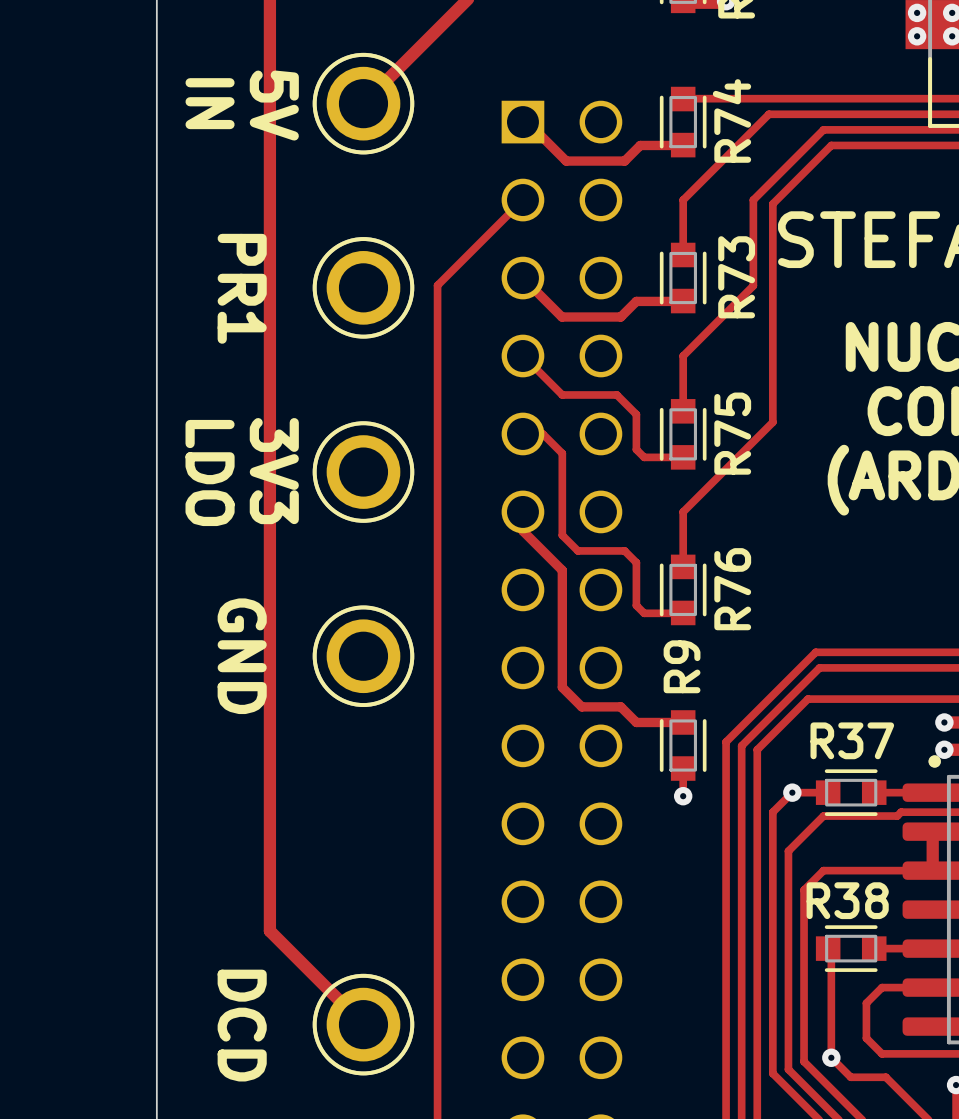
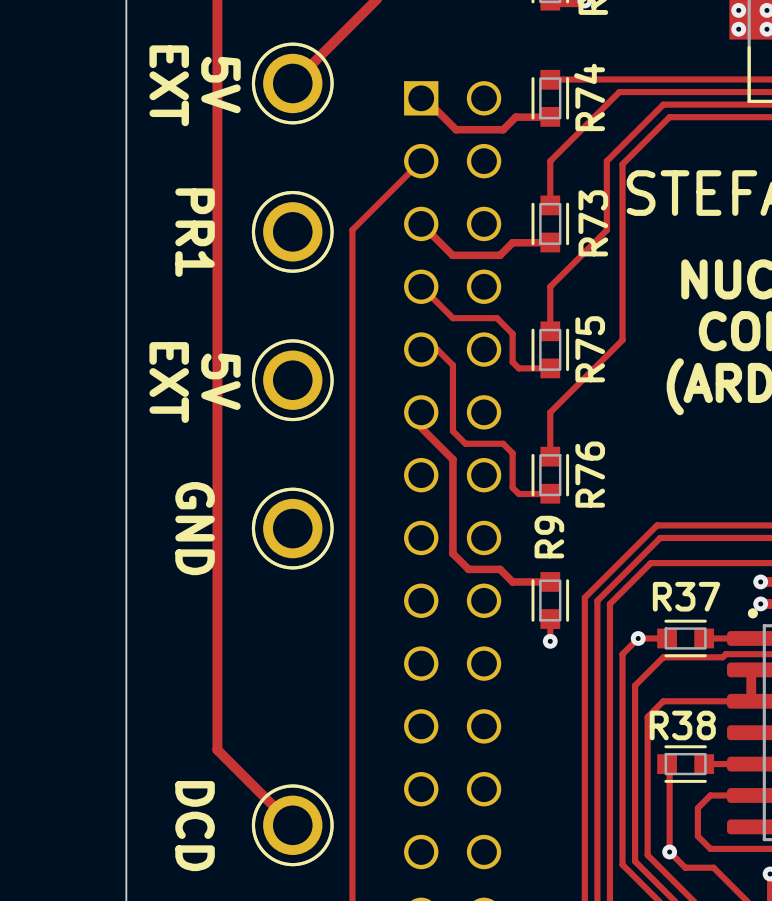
text: IN (210, 103) -> EXT (169, 85)
text: 3V3 (274, 471) -> 5V (220, 381)
text: LDO (210, 472) -> EXT (169, 382)

